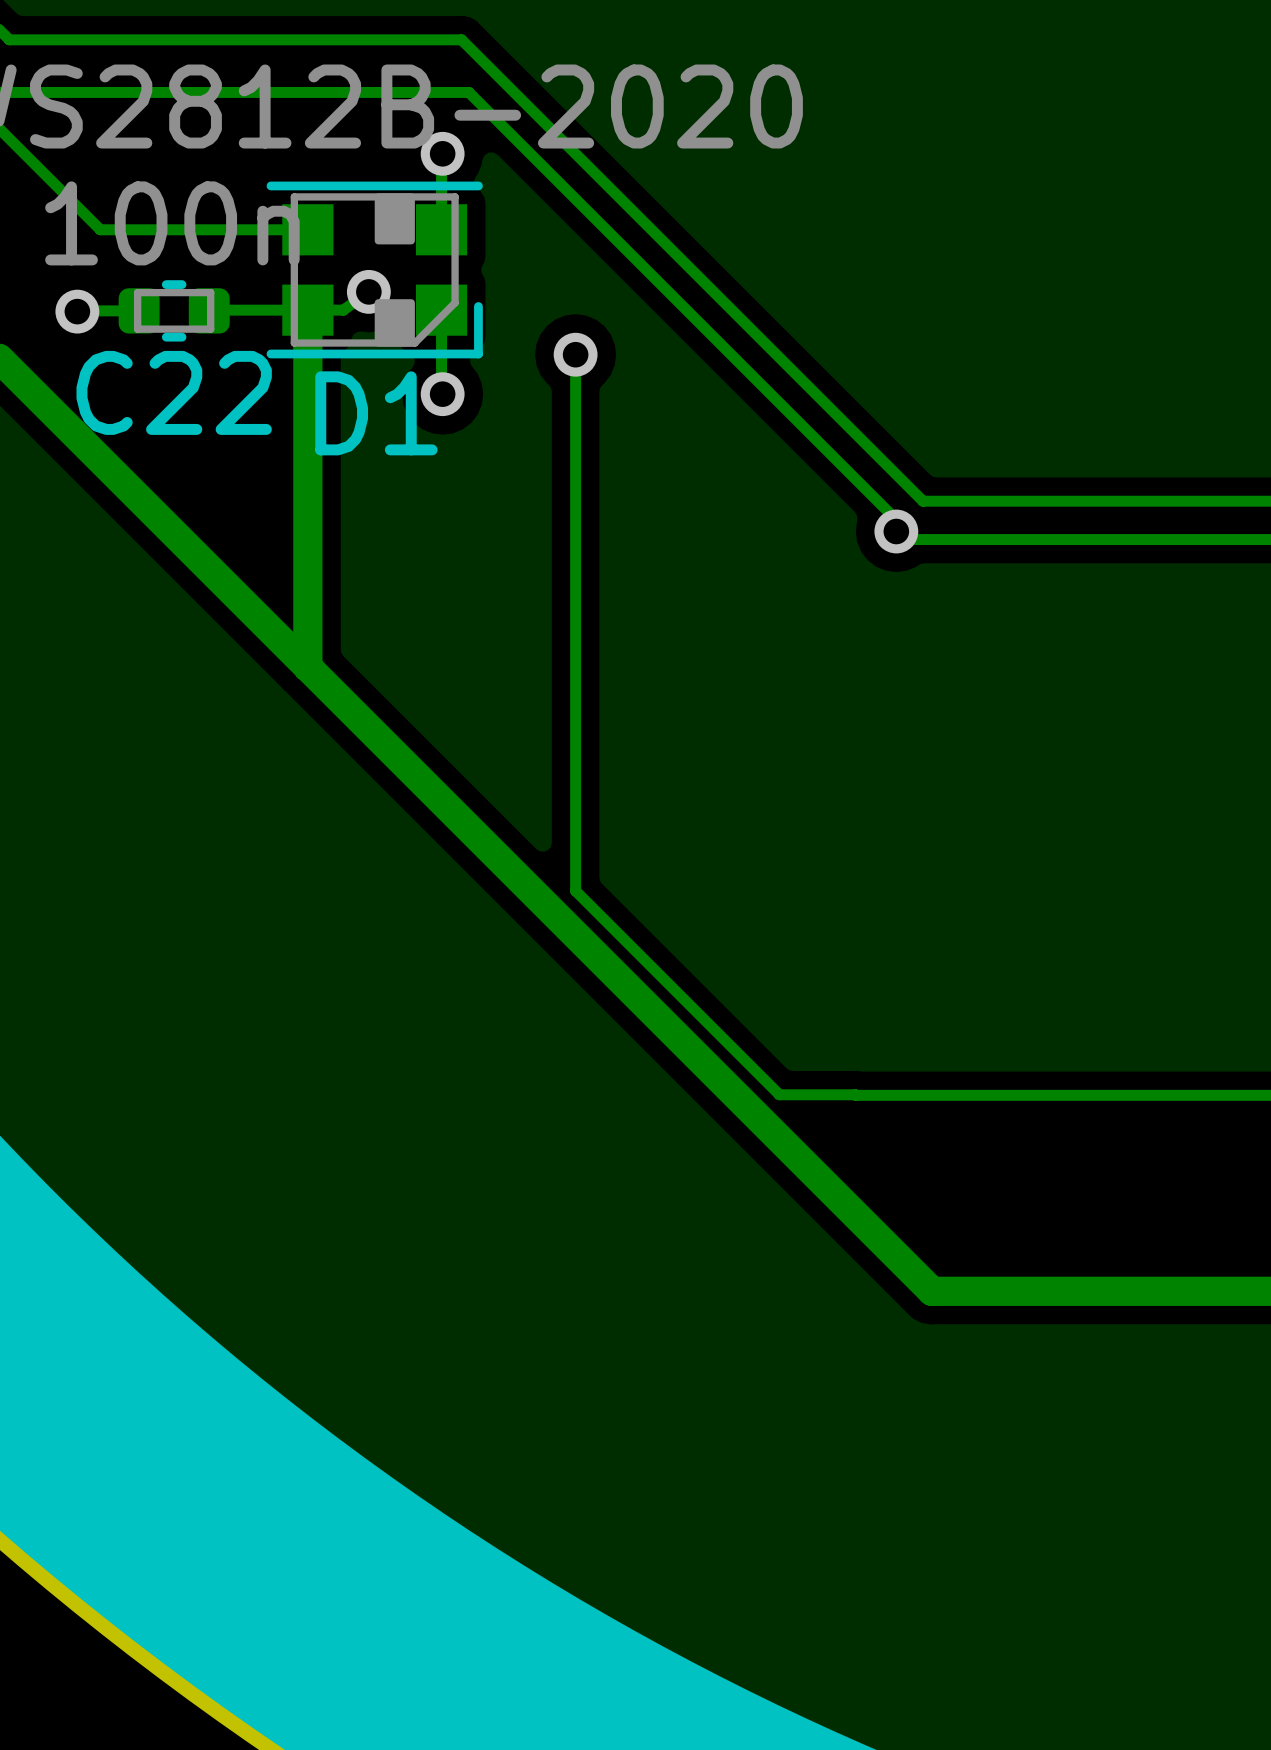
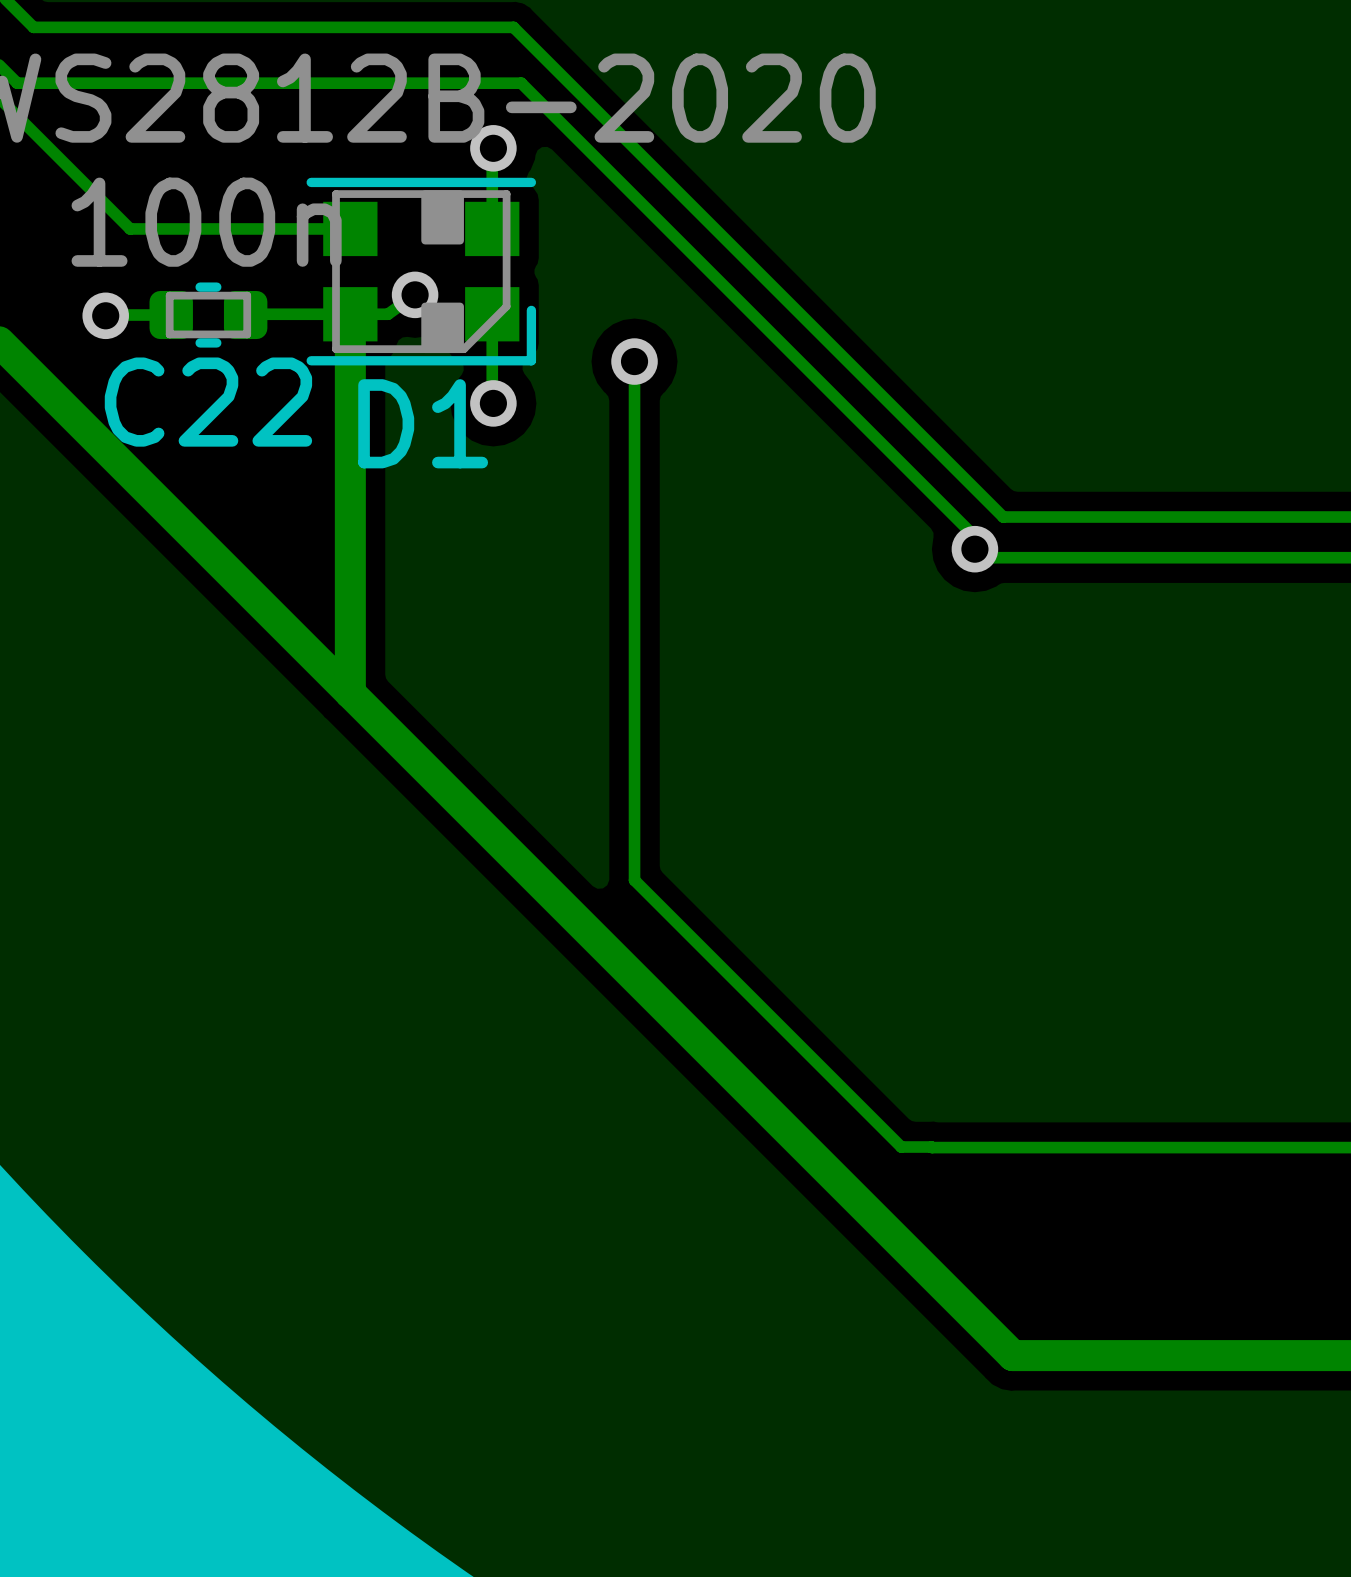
track: (575, 843) (575, 890) (779, 1094) (826, 1094) -> (634, 880) (901, 1147)

